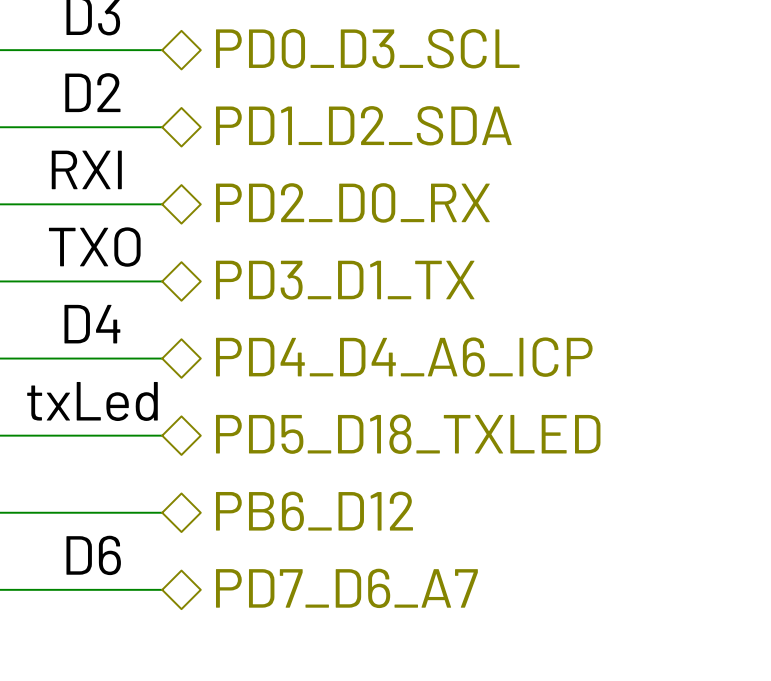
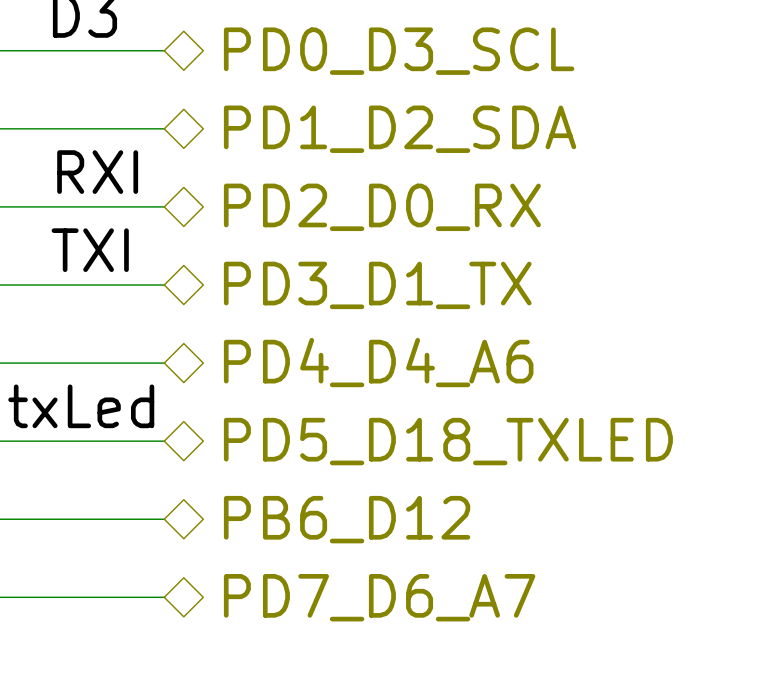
label: D2 (92, 92) -> none
label: TXO (94, 247) -> TXI (90, 250)
label: D4 (92, 324) -> none
hierarchical label: PD4_D4_A6_ICP (404, 357) -> PD4_D4_A6 (378, 362)
label: D6 (93, 555) -> none

